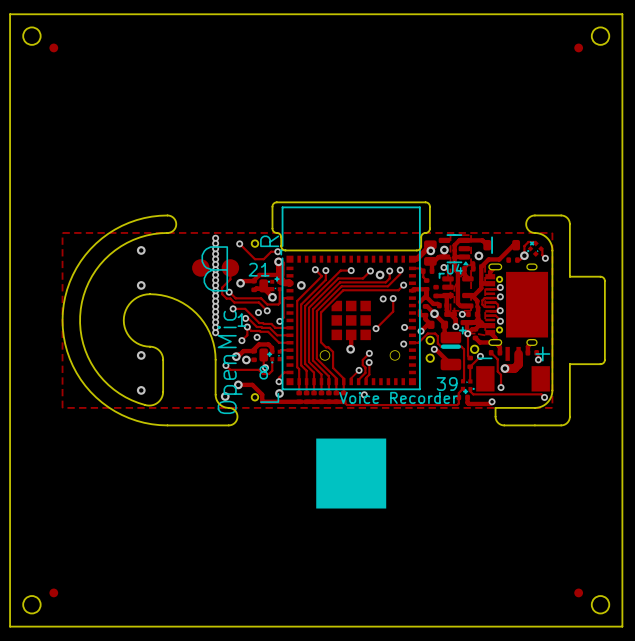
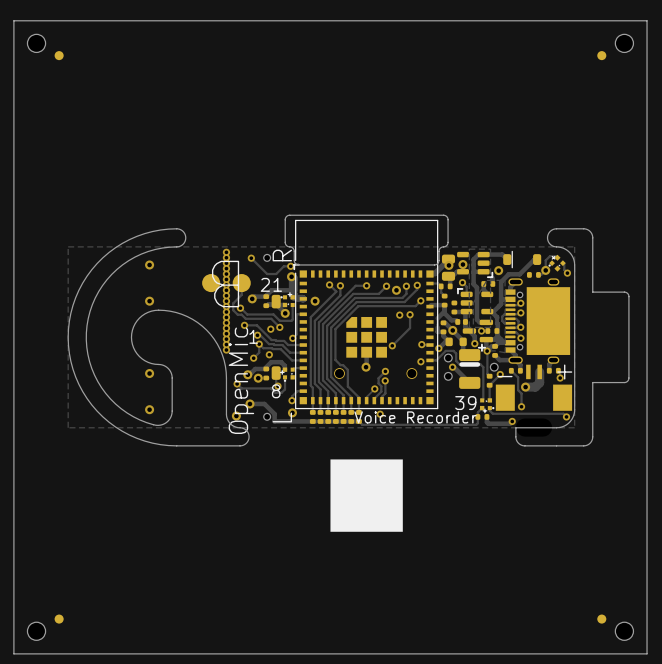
U4: (454, 249) -> none
part: none -> (475, 264)

